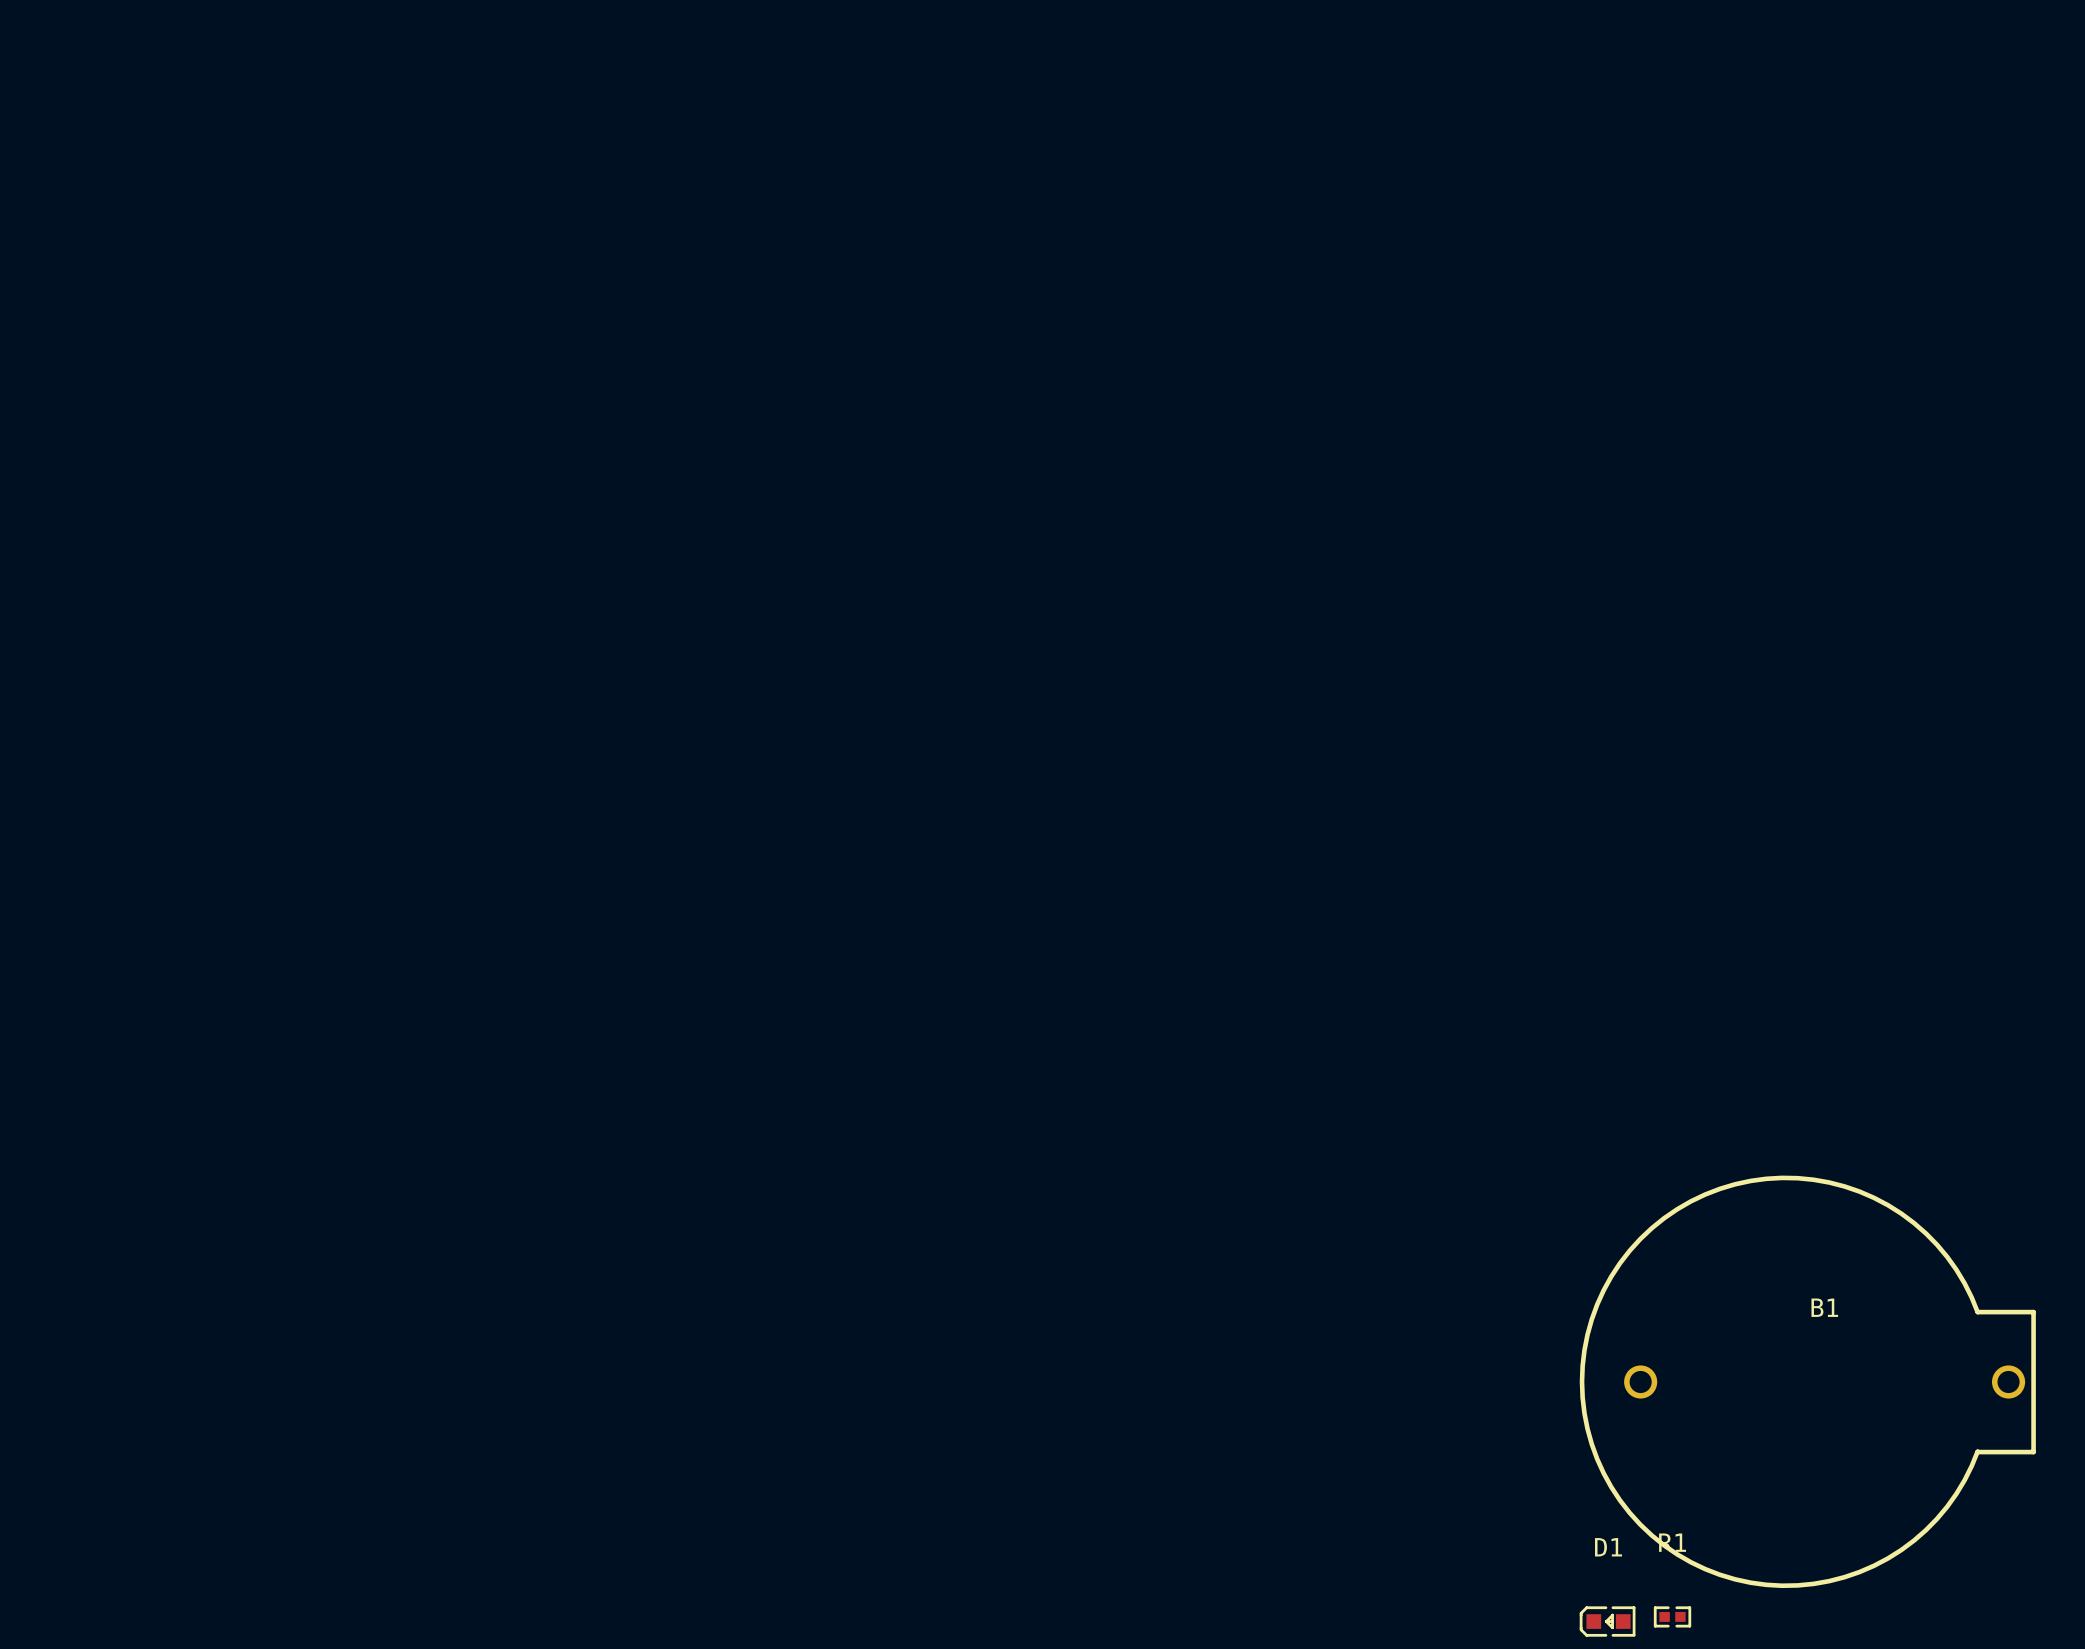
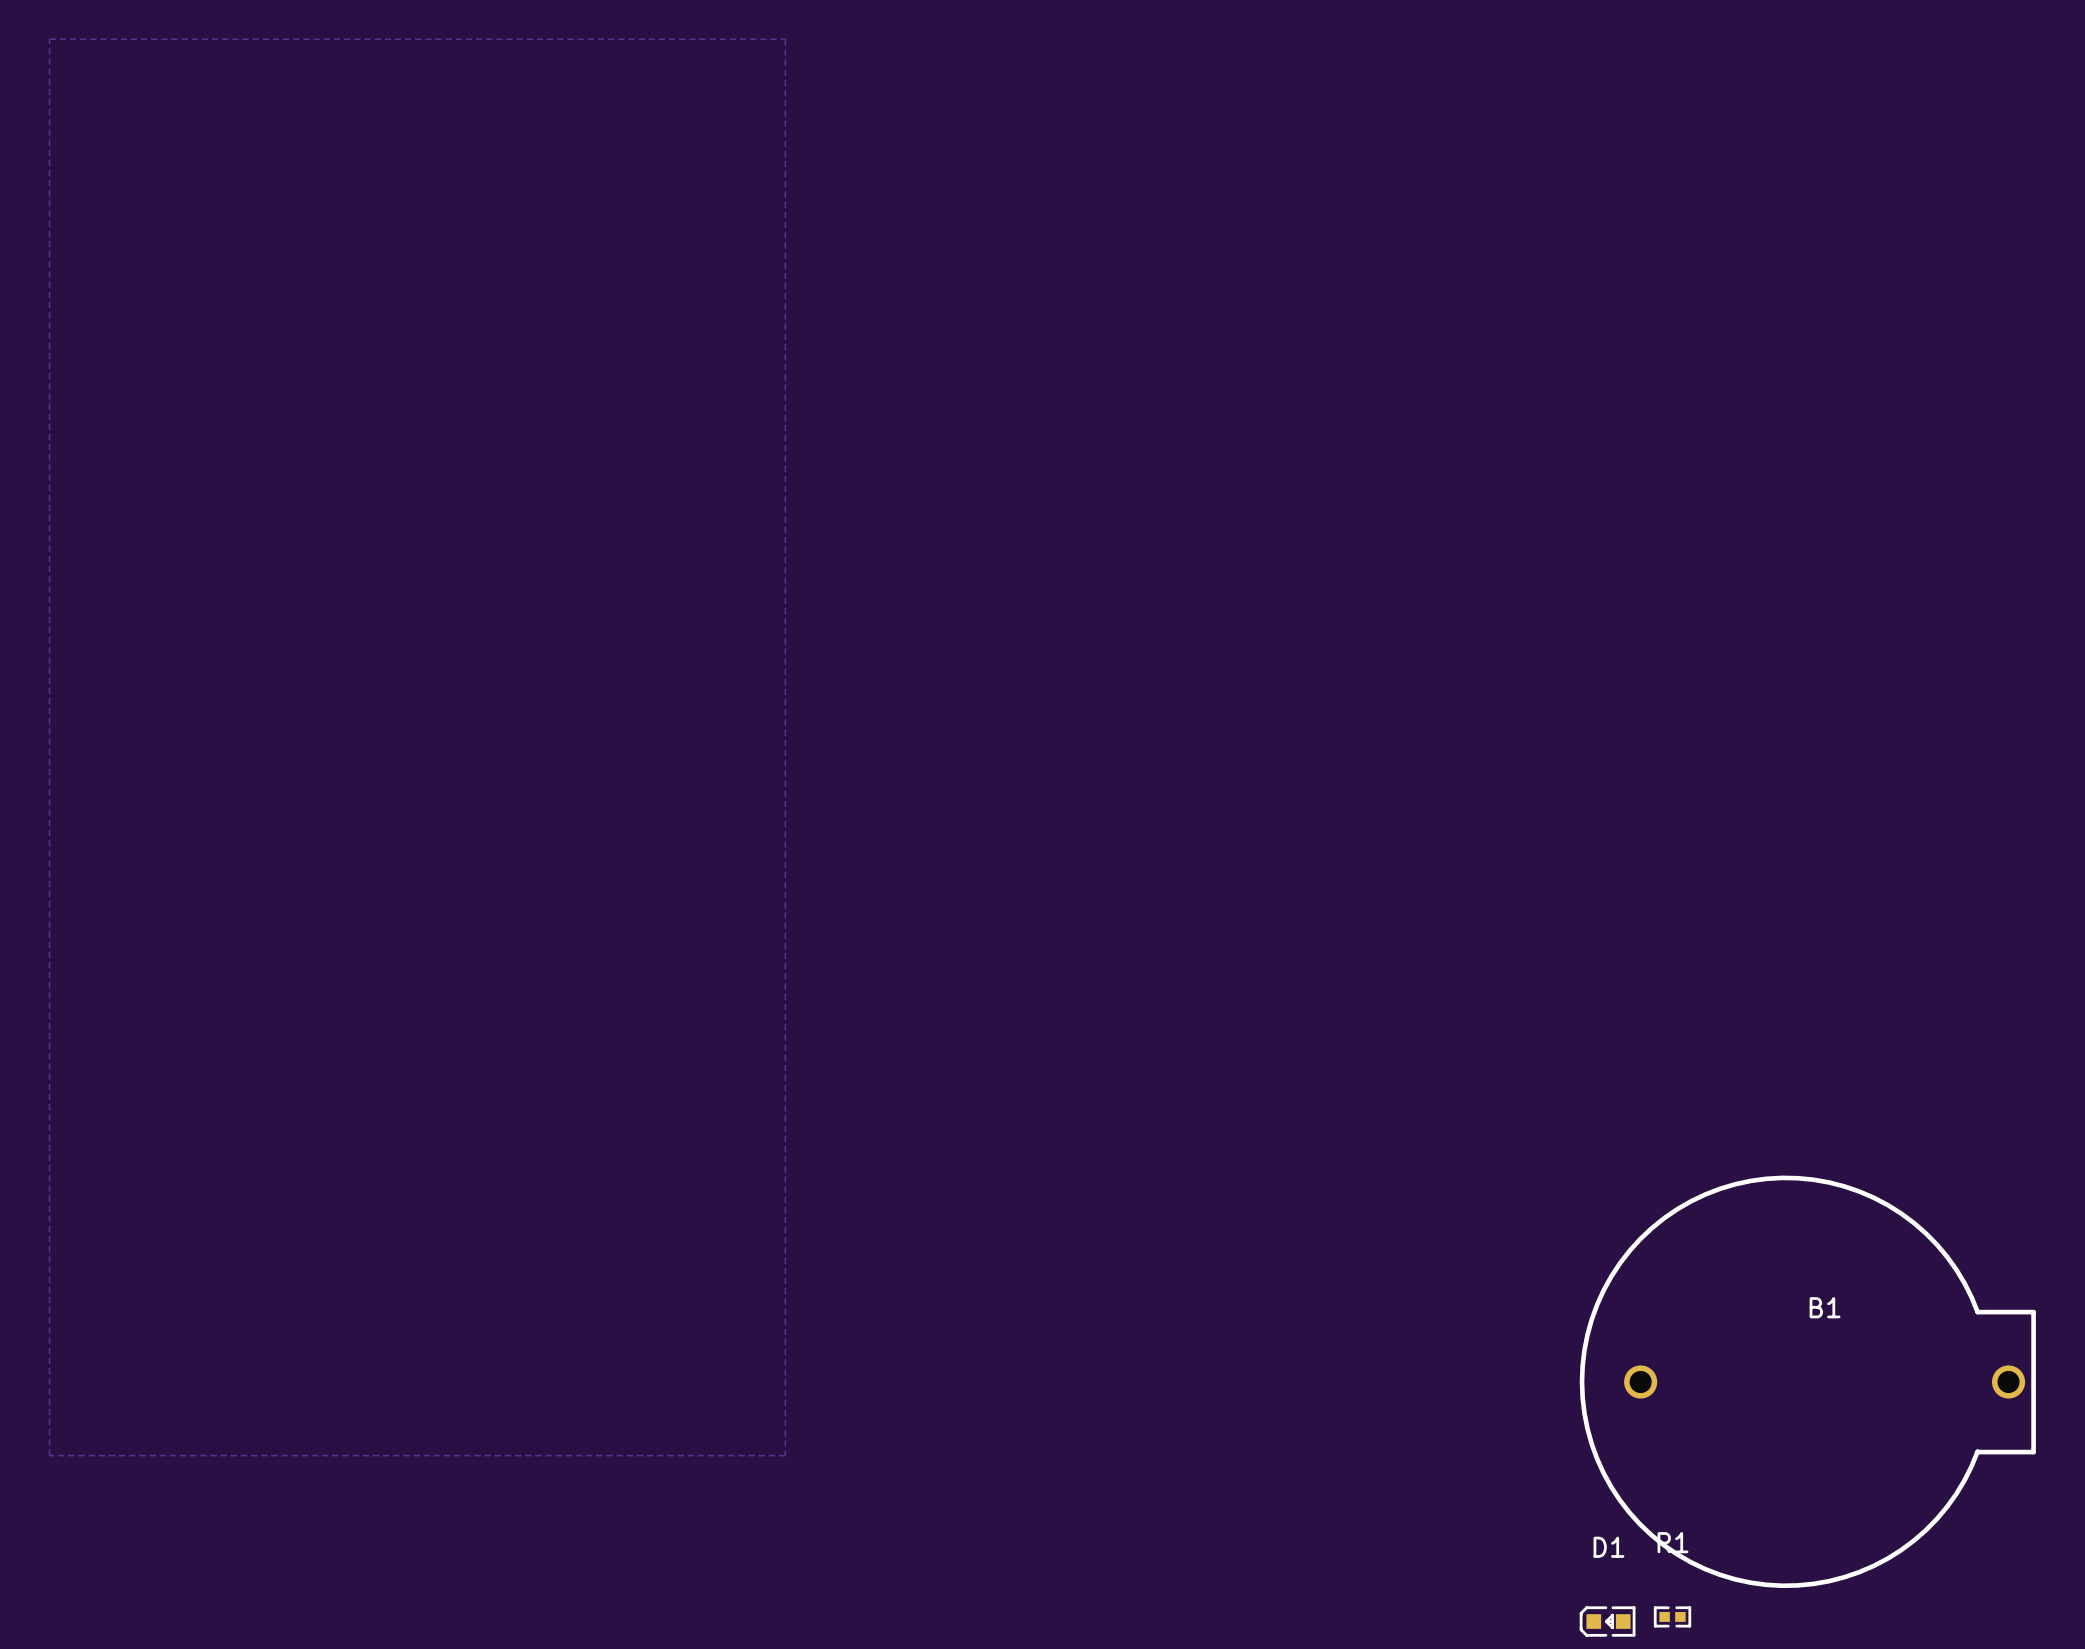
zone outline: none -> (49, 39) (785, 39) (785, 1455) (49, 1455) (49, 39)

